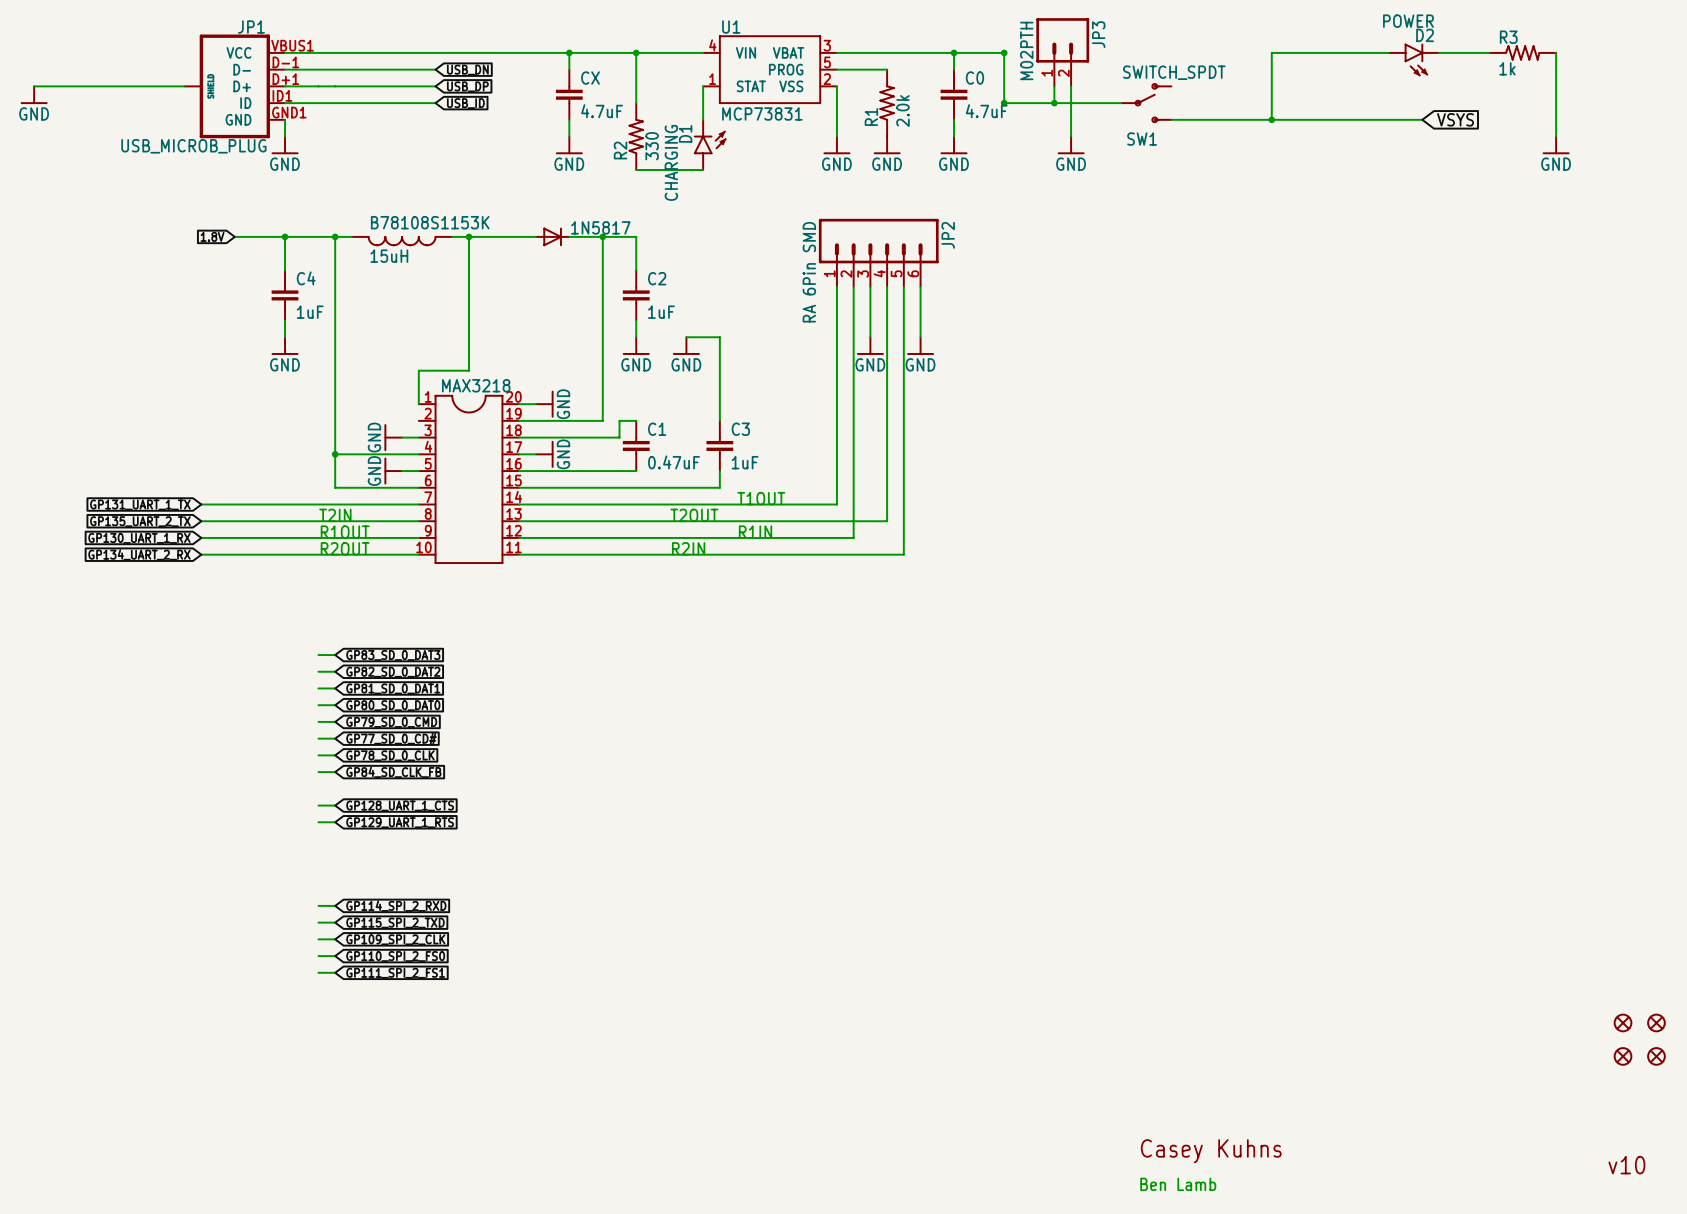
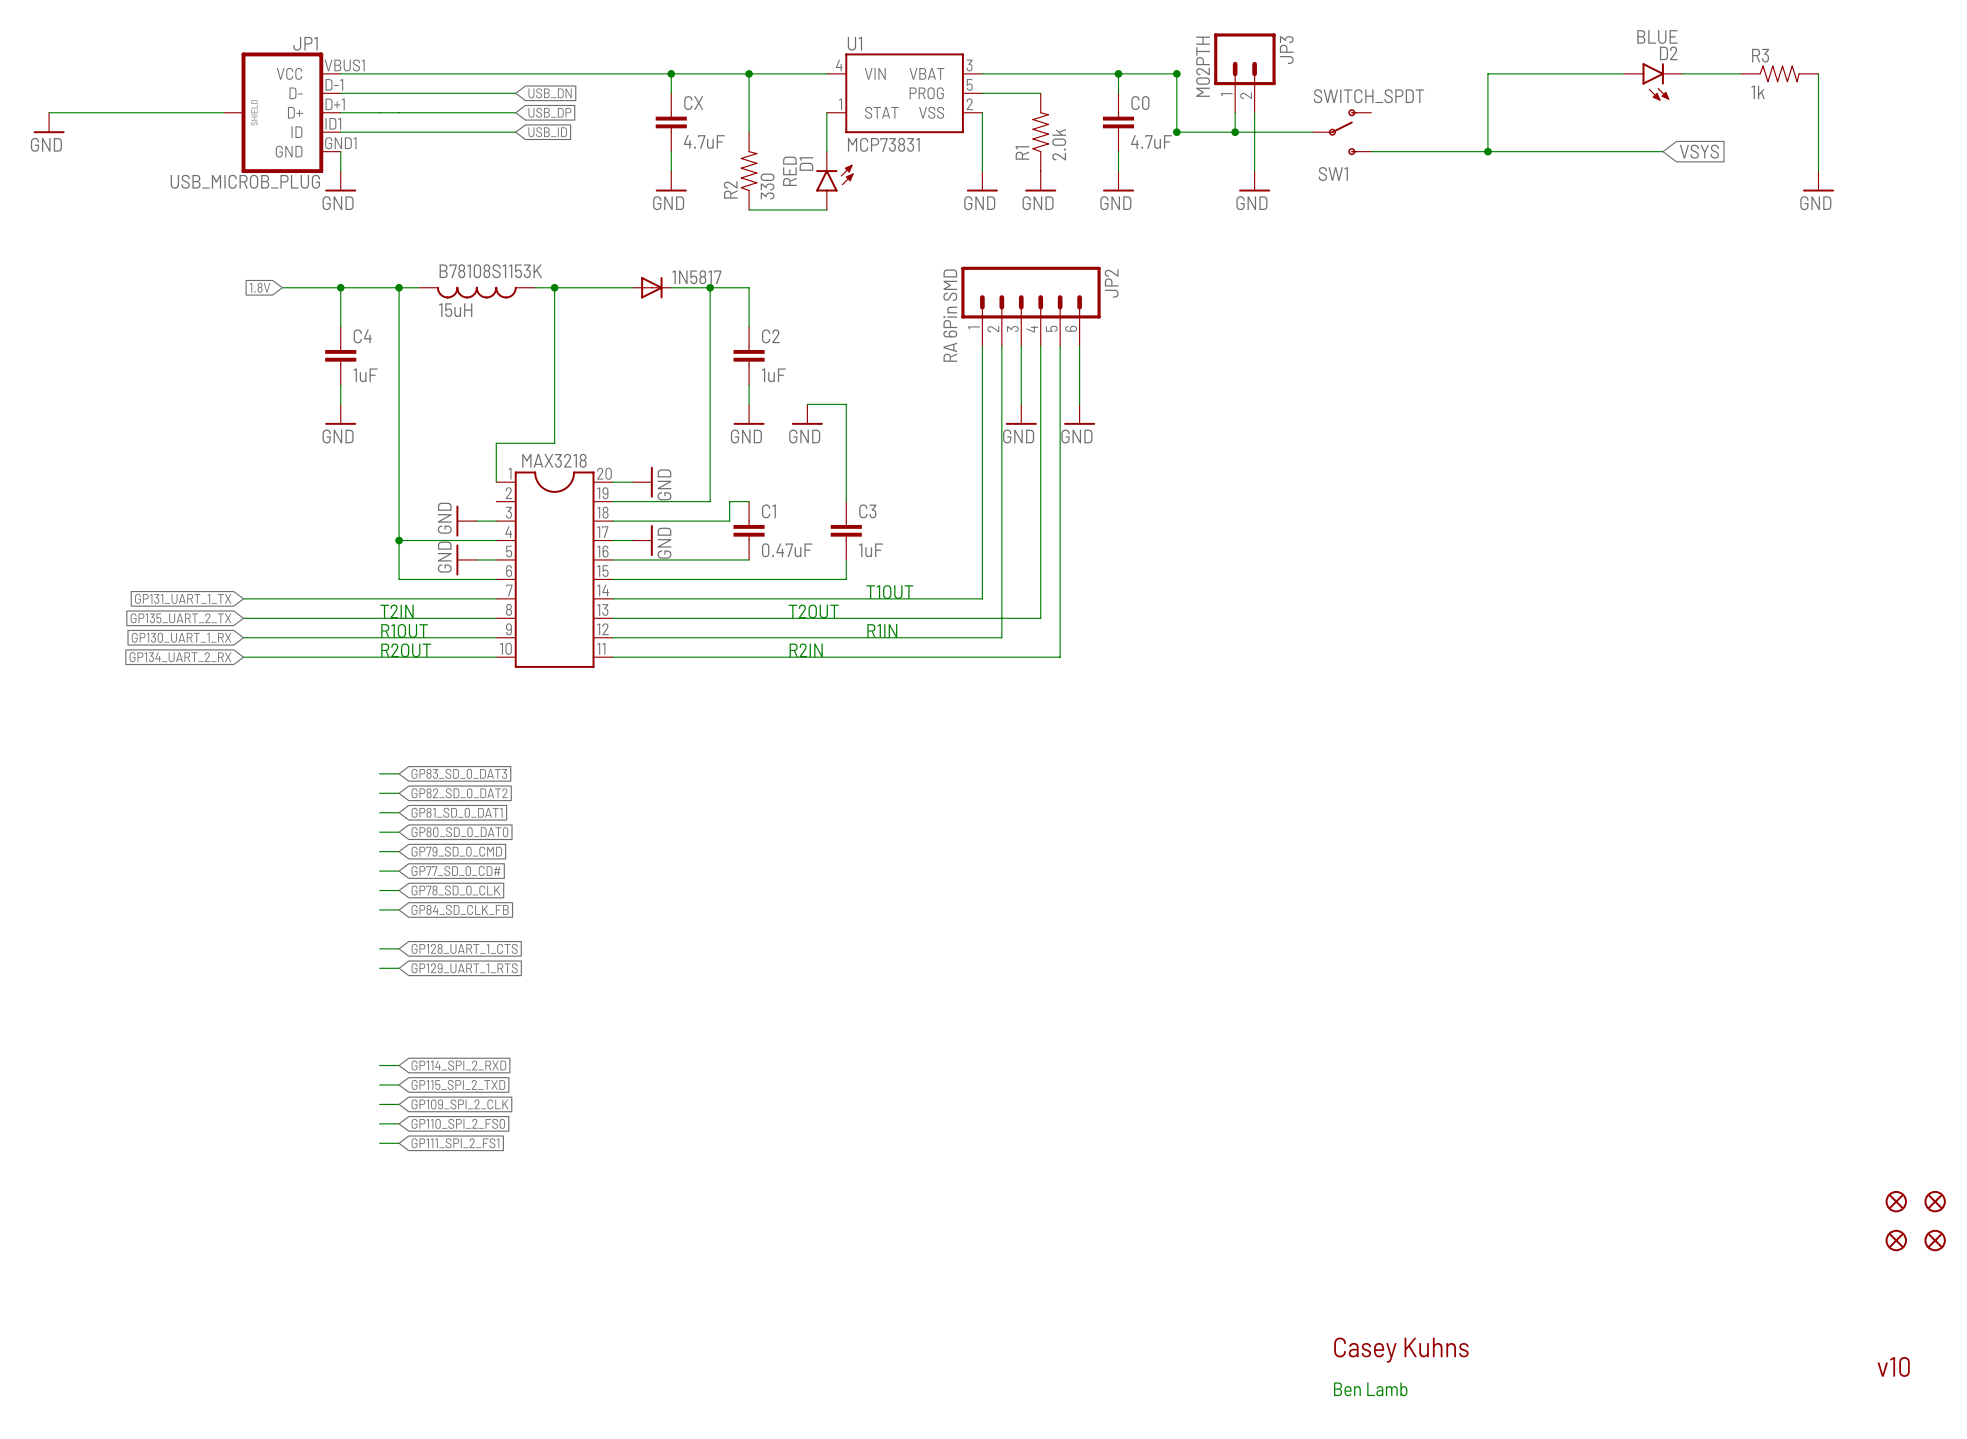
D2 value: POWER (1408, 21) -> BLUE (1657, 37)
D1 value: CHARGING (671, 162) -> RED (789, 171)

